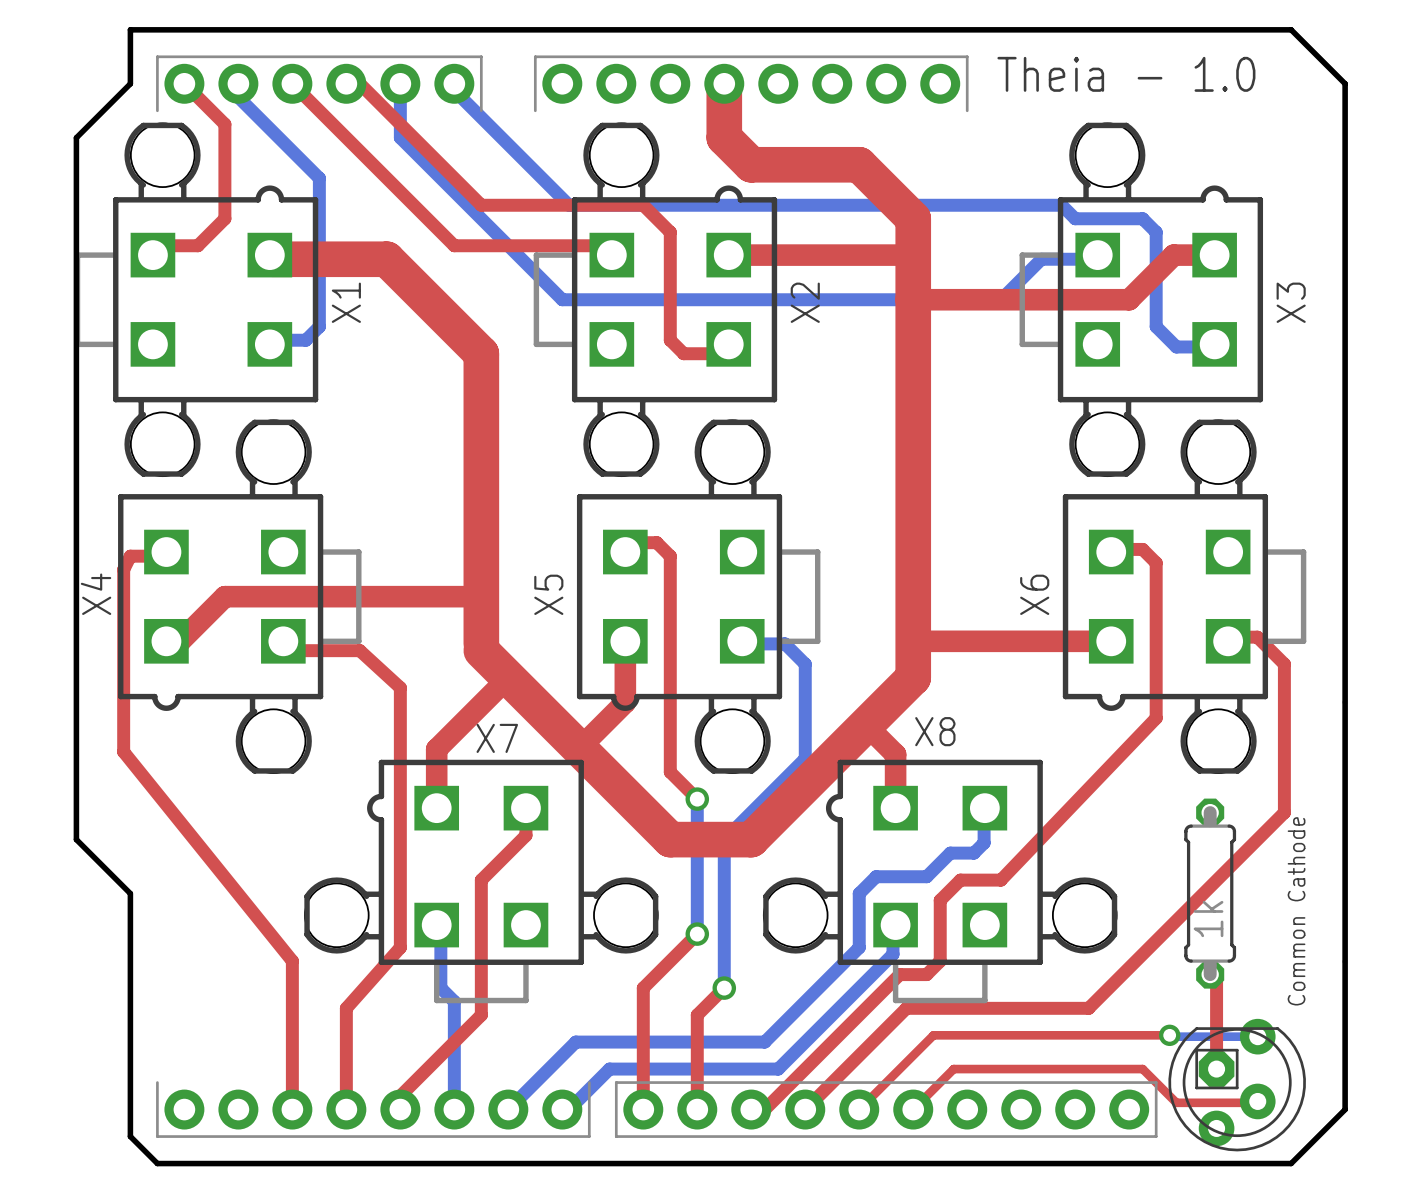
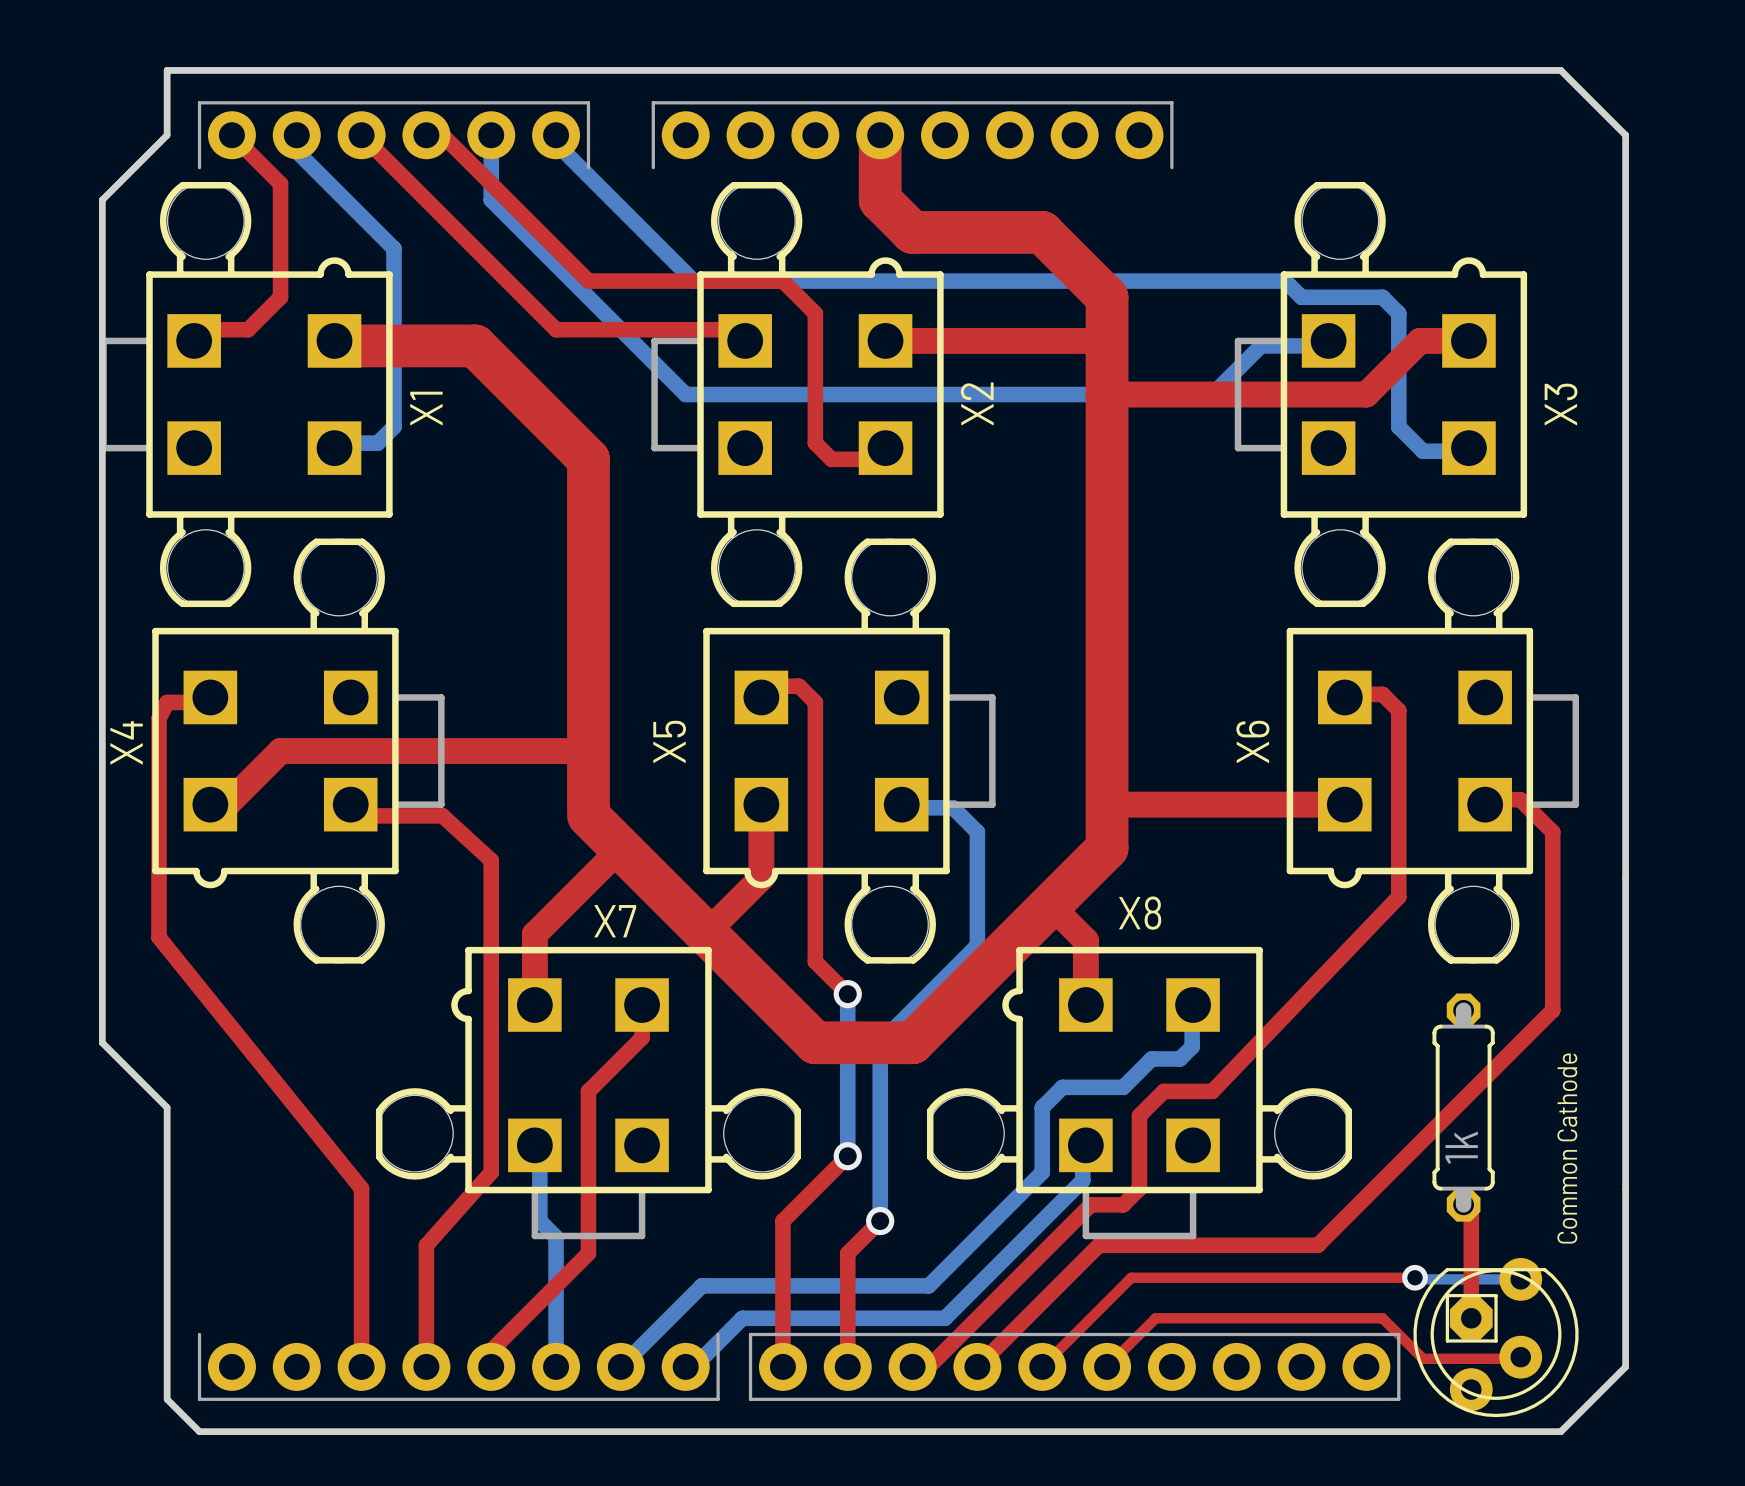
text: Theia - 1.0 (1126, 74) -> none

